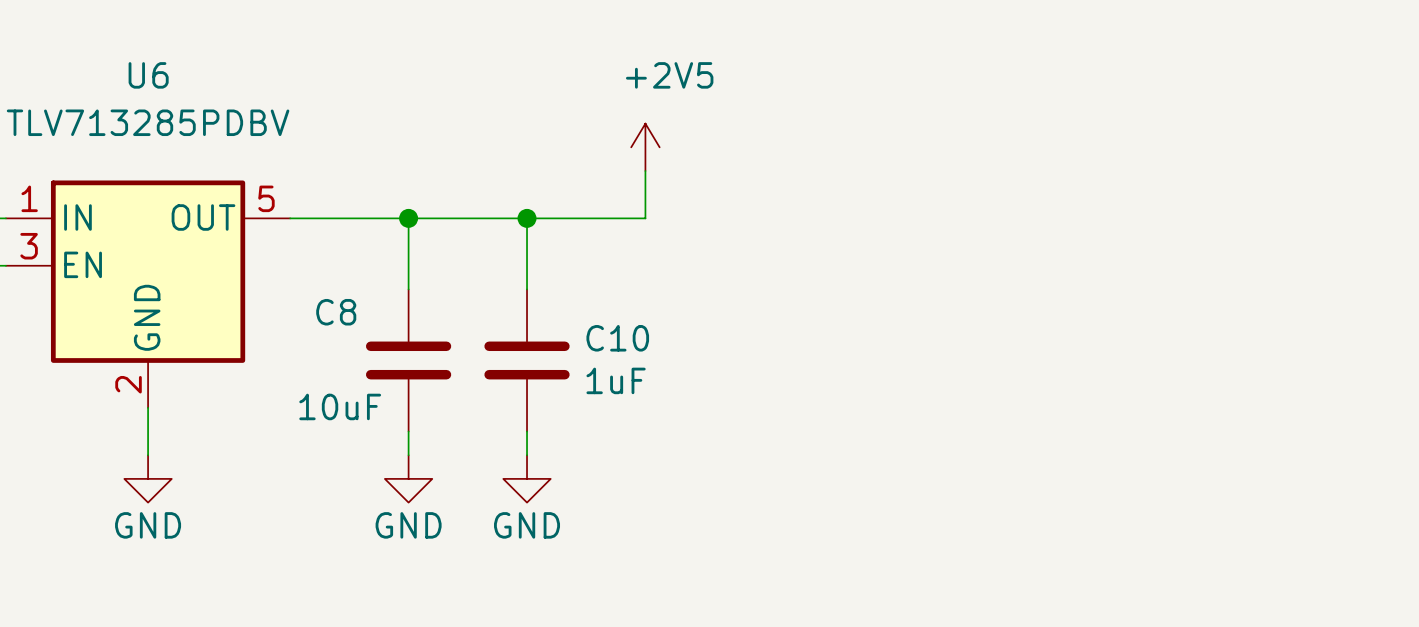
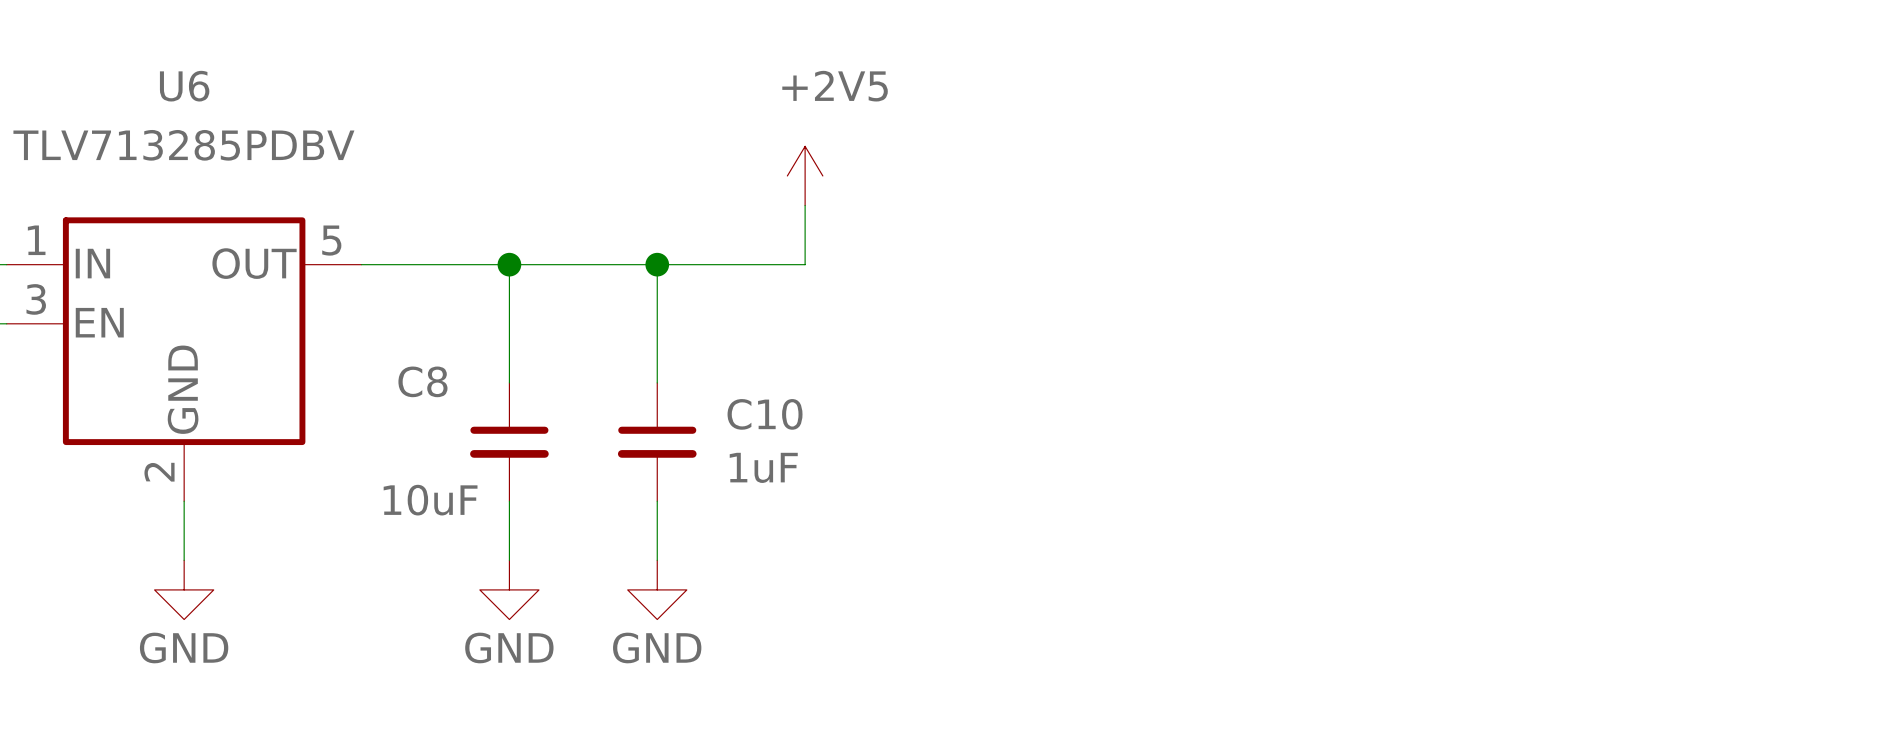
C8 symbol: [365, 289, 452, 432] -> [470, 382, 549, 502]
C10 symbol: [484, 289, 570, 432] -> [617, 382, 697, 502]

